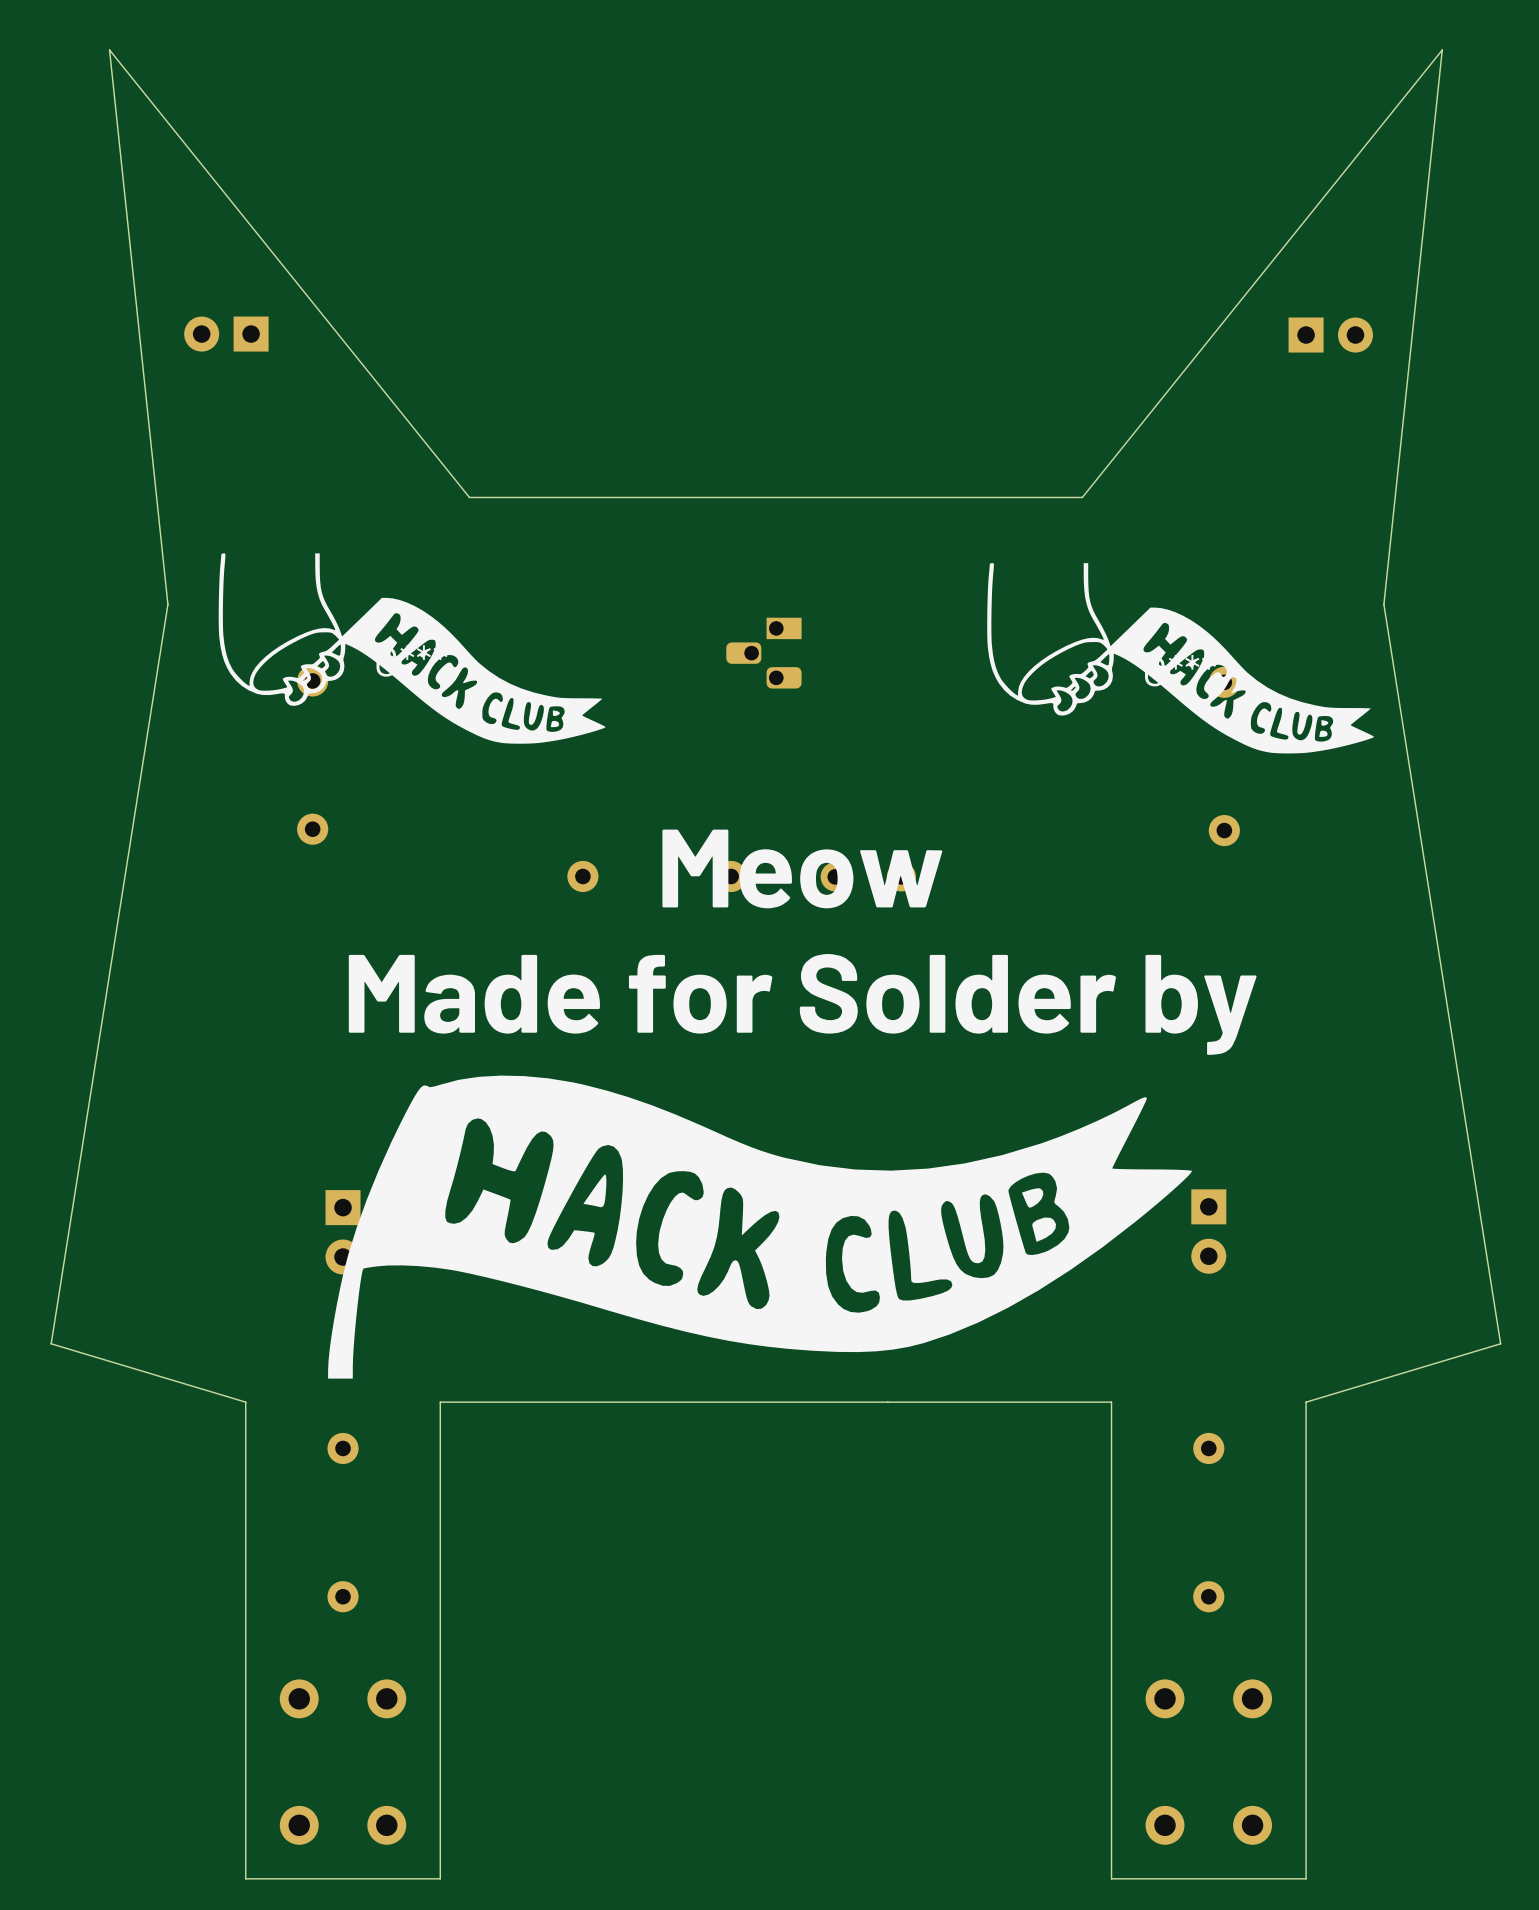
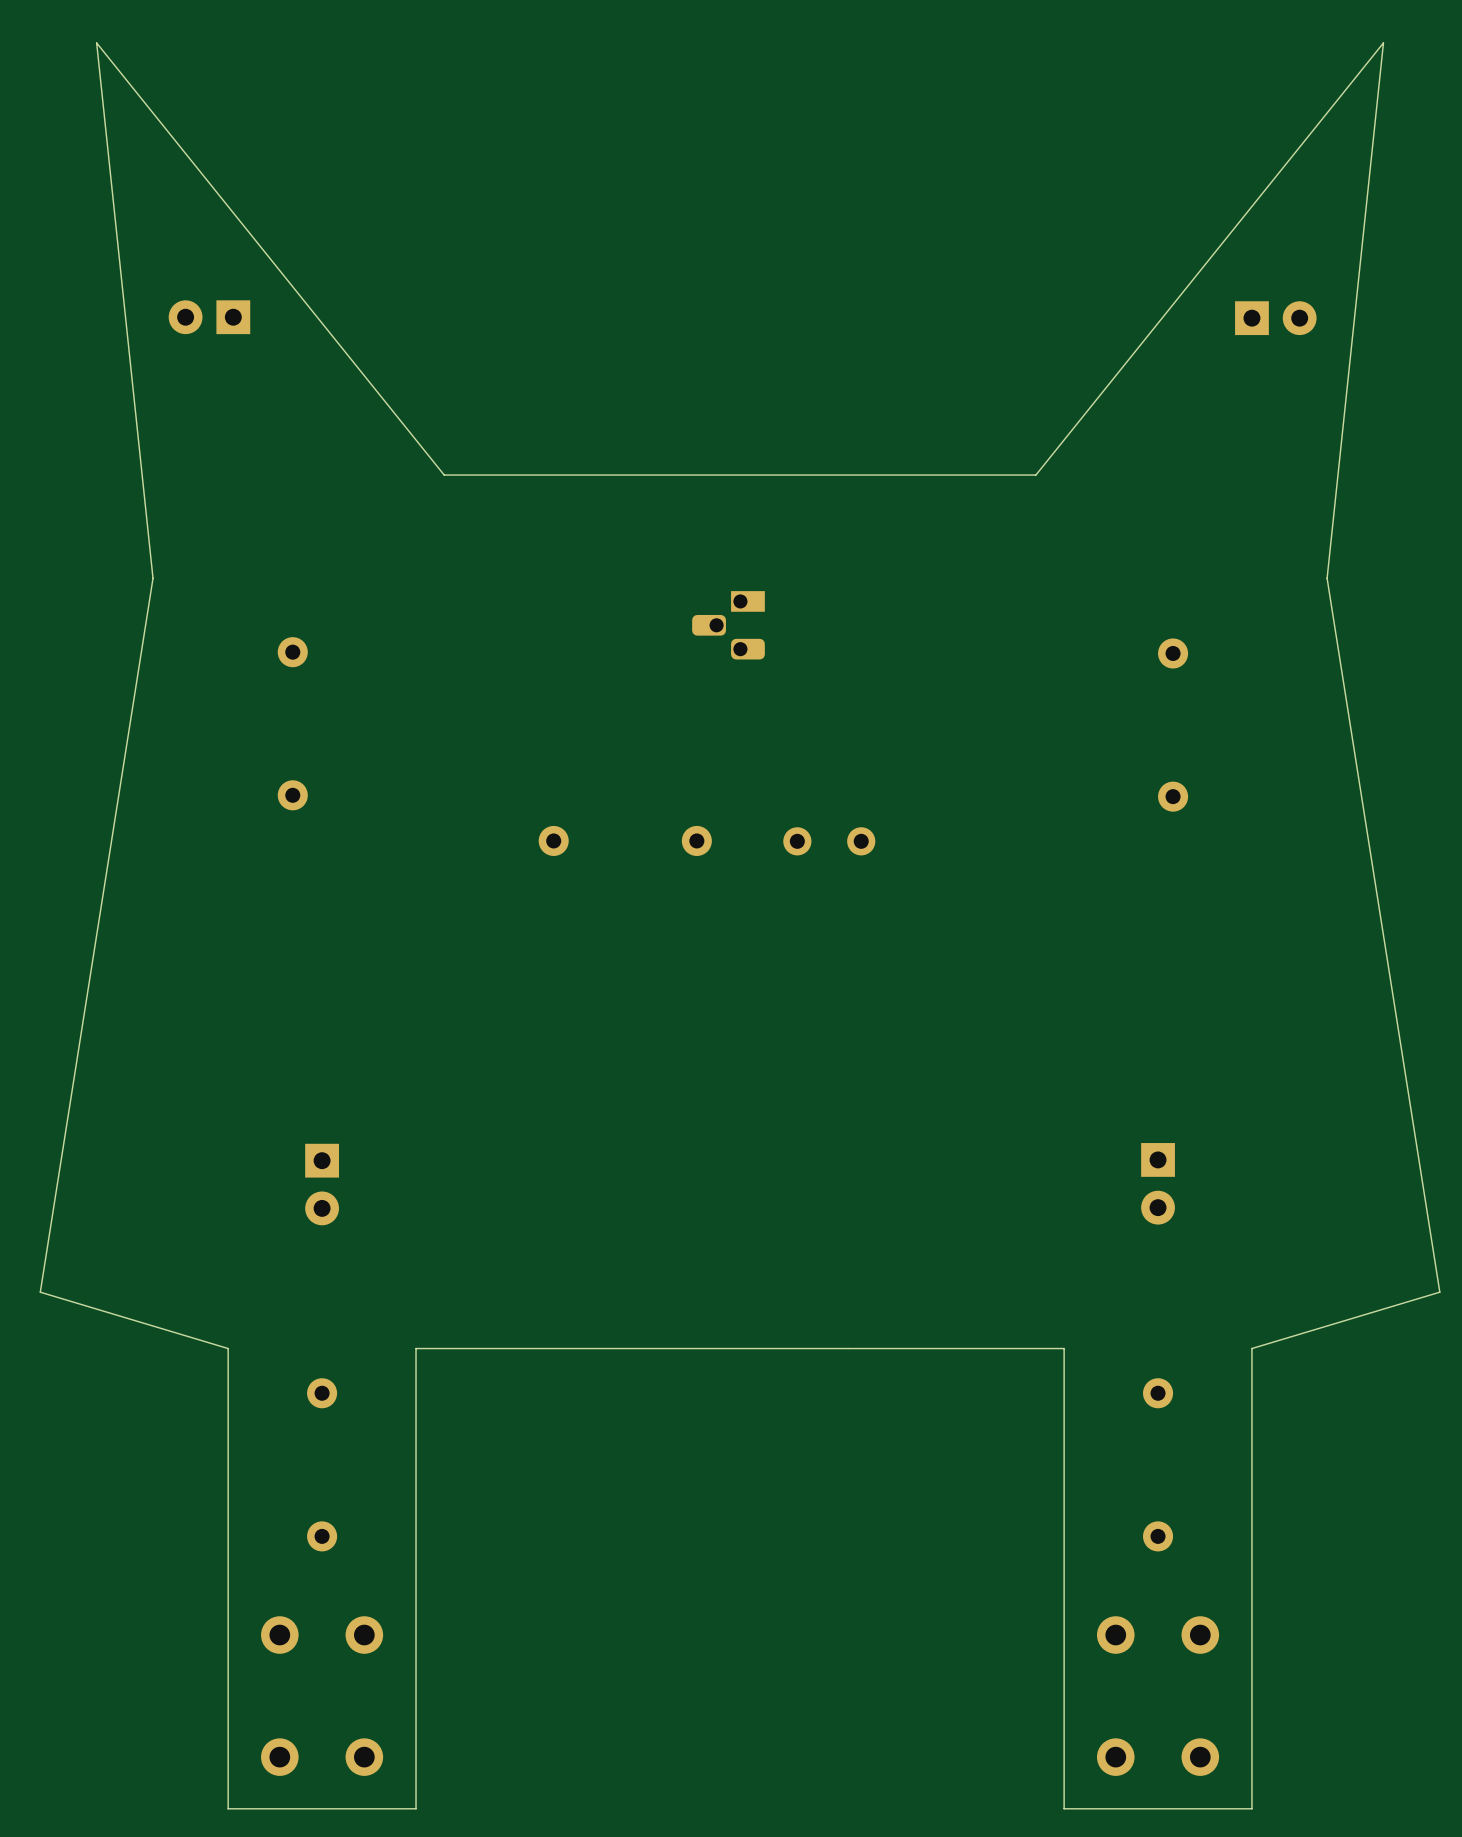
part: (412, 648) -> none
part: (1180, 658) -> none
text: Meow (802, 868) -> none
text: Made for Solder by (802, 1004) -> none
drawing: [328, 1075, 1192, 1379] -> none

